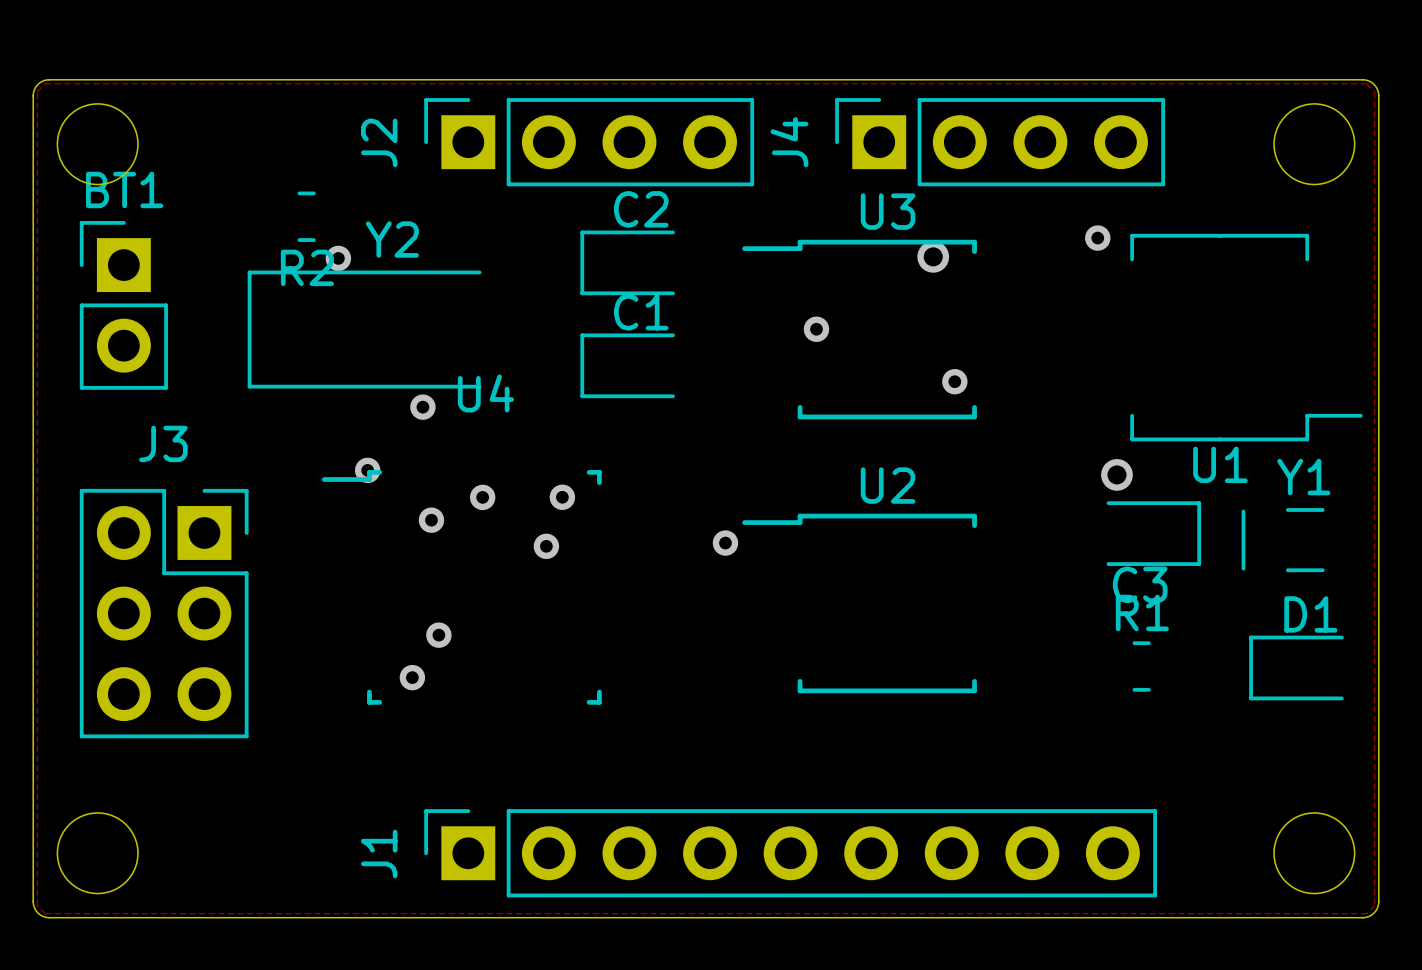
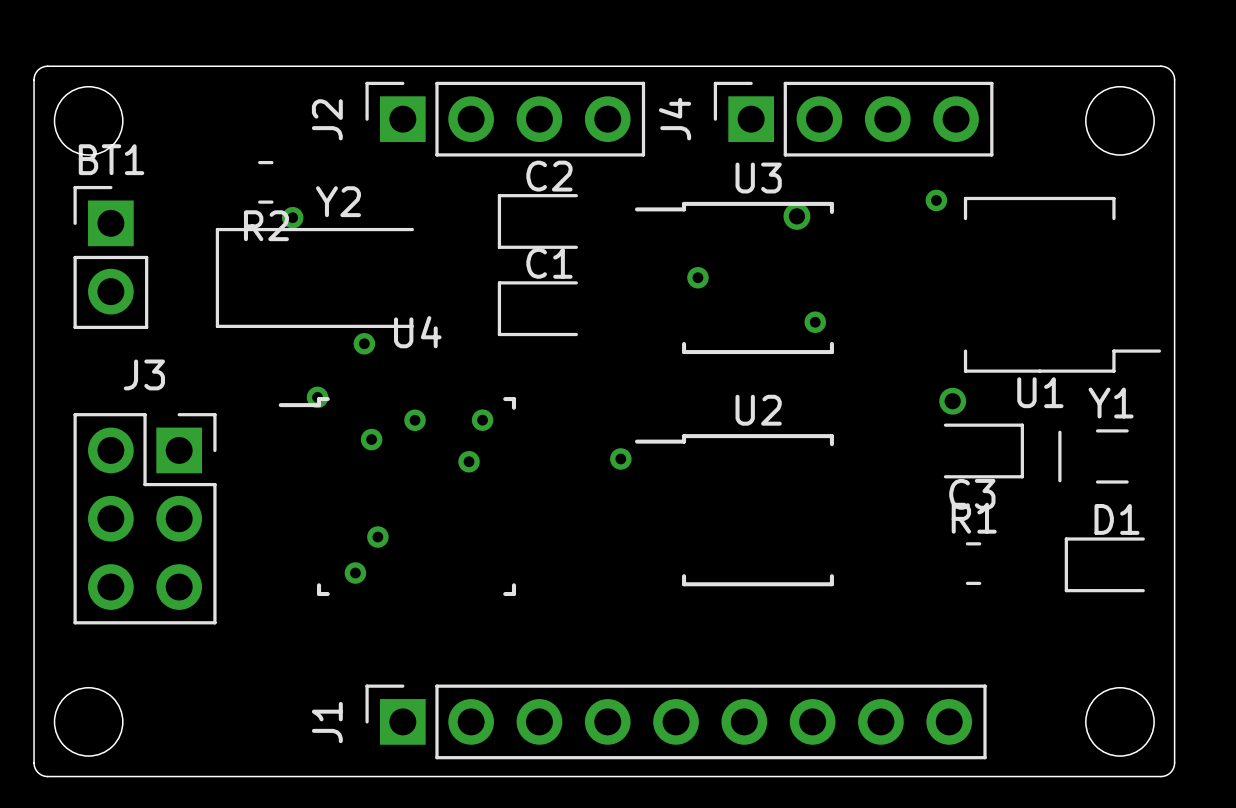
zone outline: (45, 83) (37, 91) (37, 905) (45, 913) (1366, 913) (1374, 905) (1374, 91) (1366, 83) (45, 83) -> none

